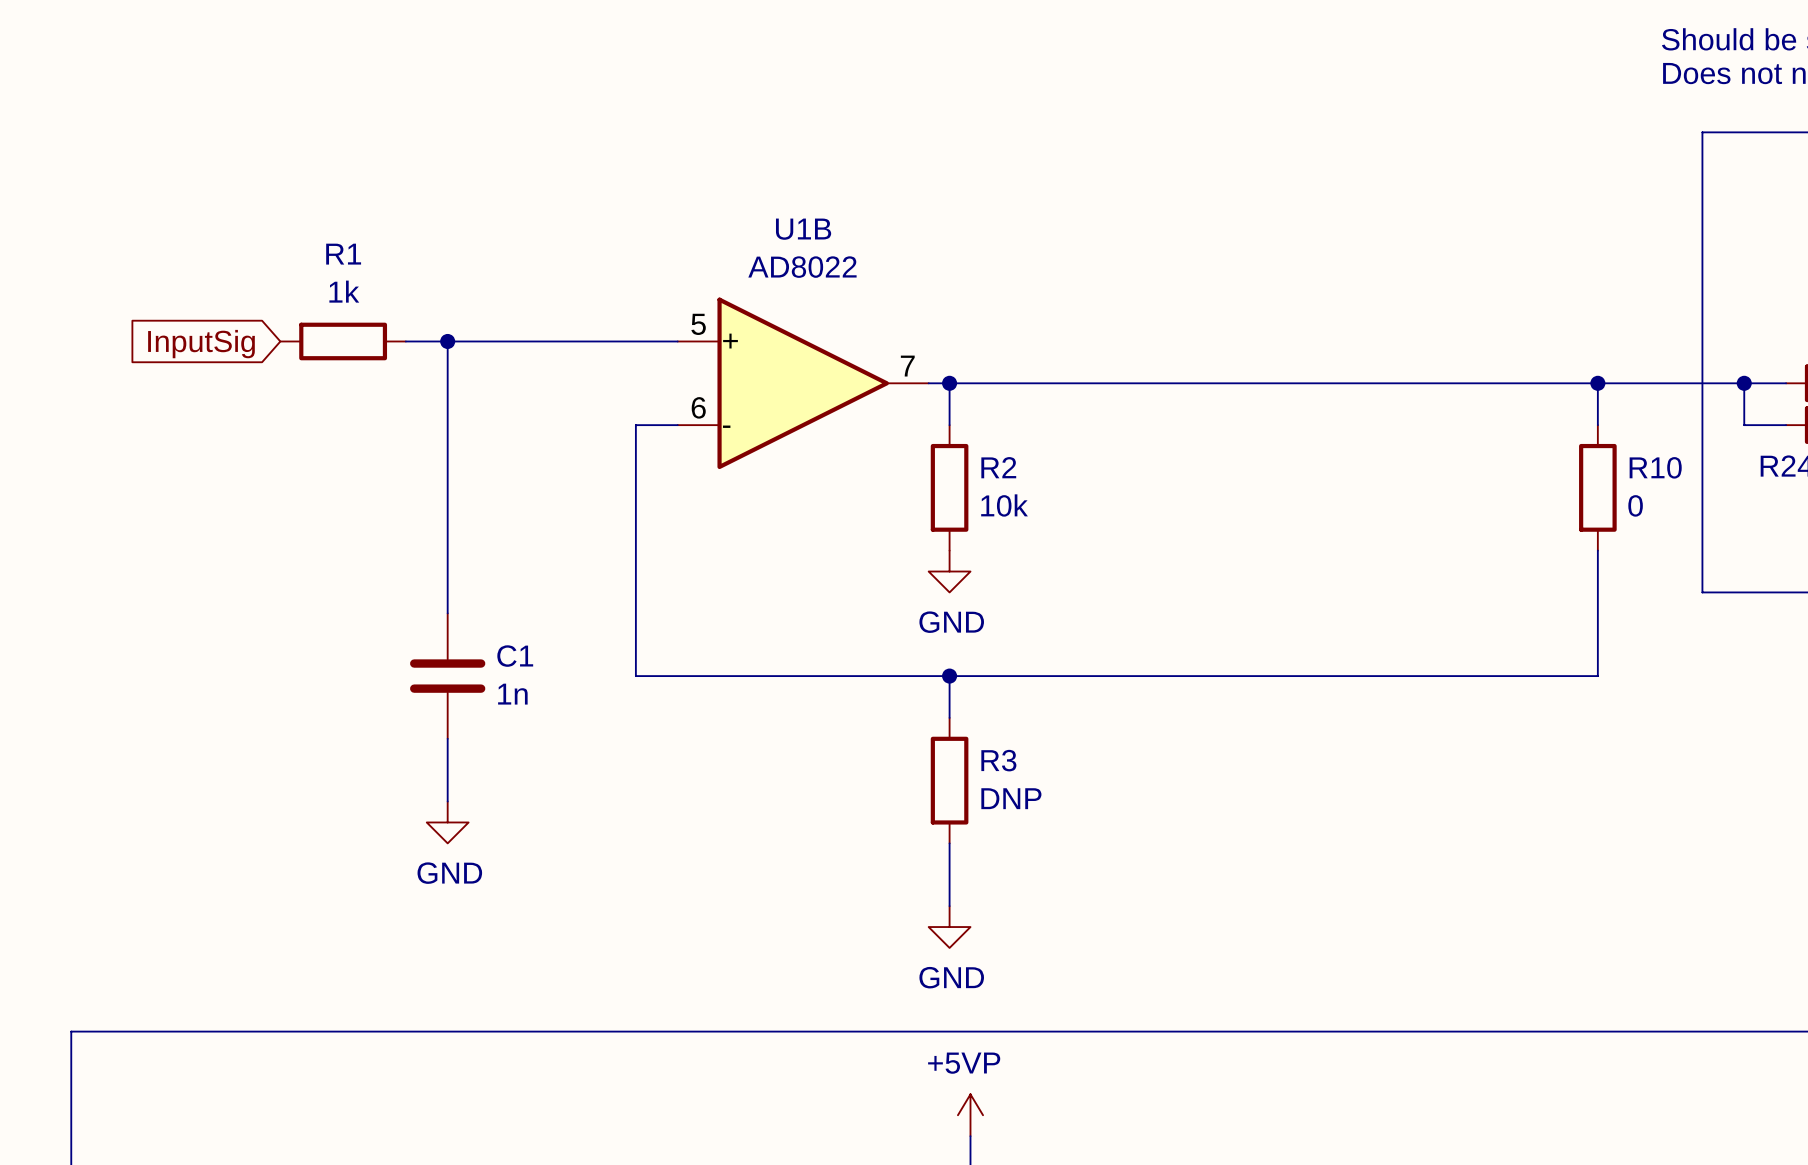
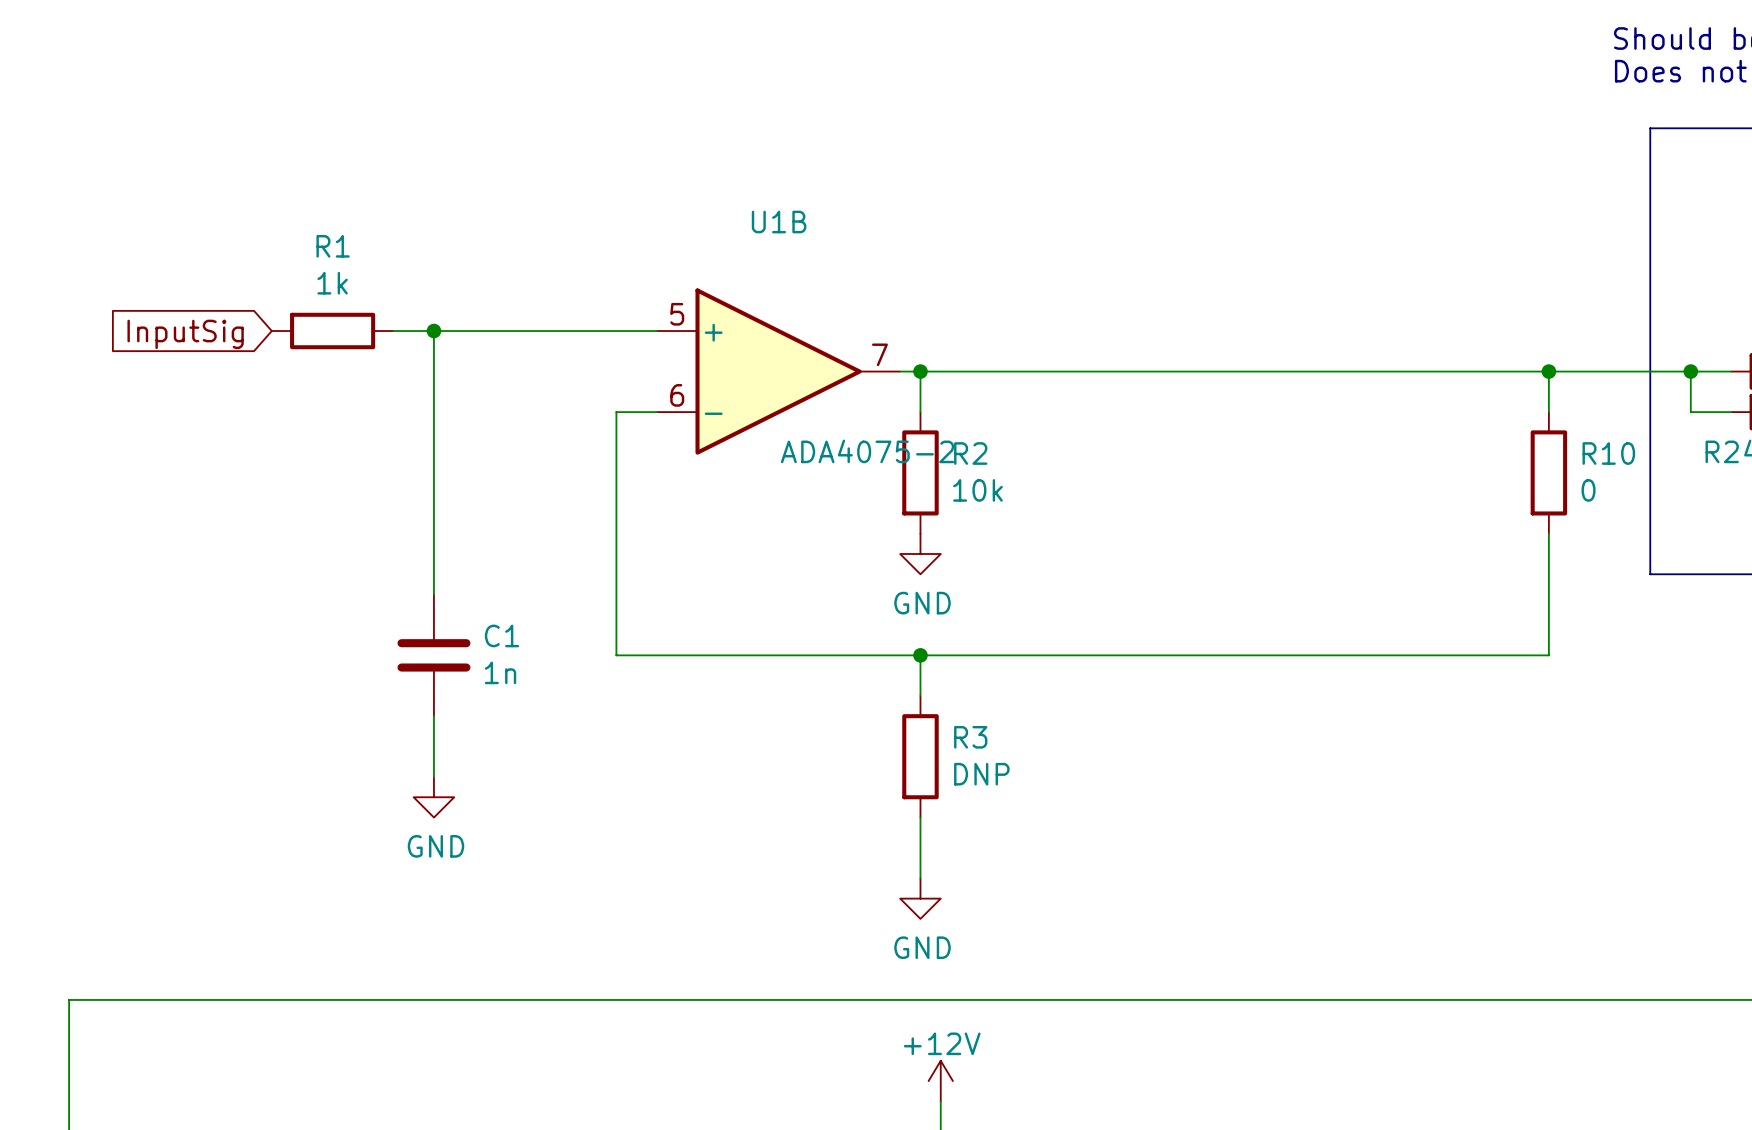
U1B value: AD8022 (802, 267) -> ADA4075-2 (867, 451)
power symbol: +5VP (970, 1115) -> +12V (940, 1081)

